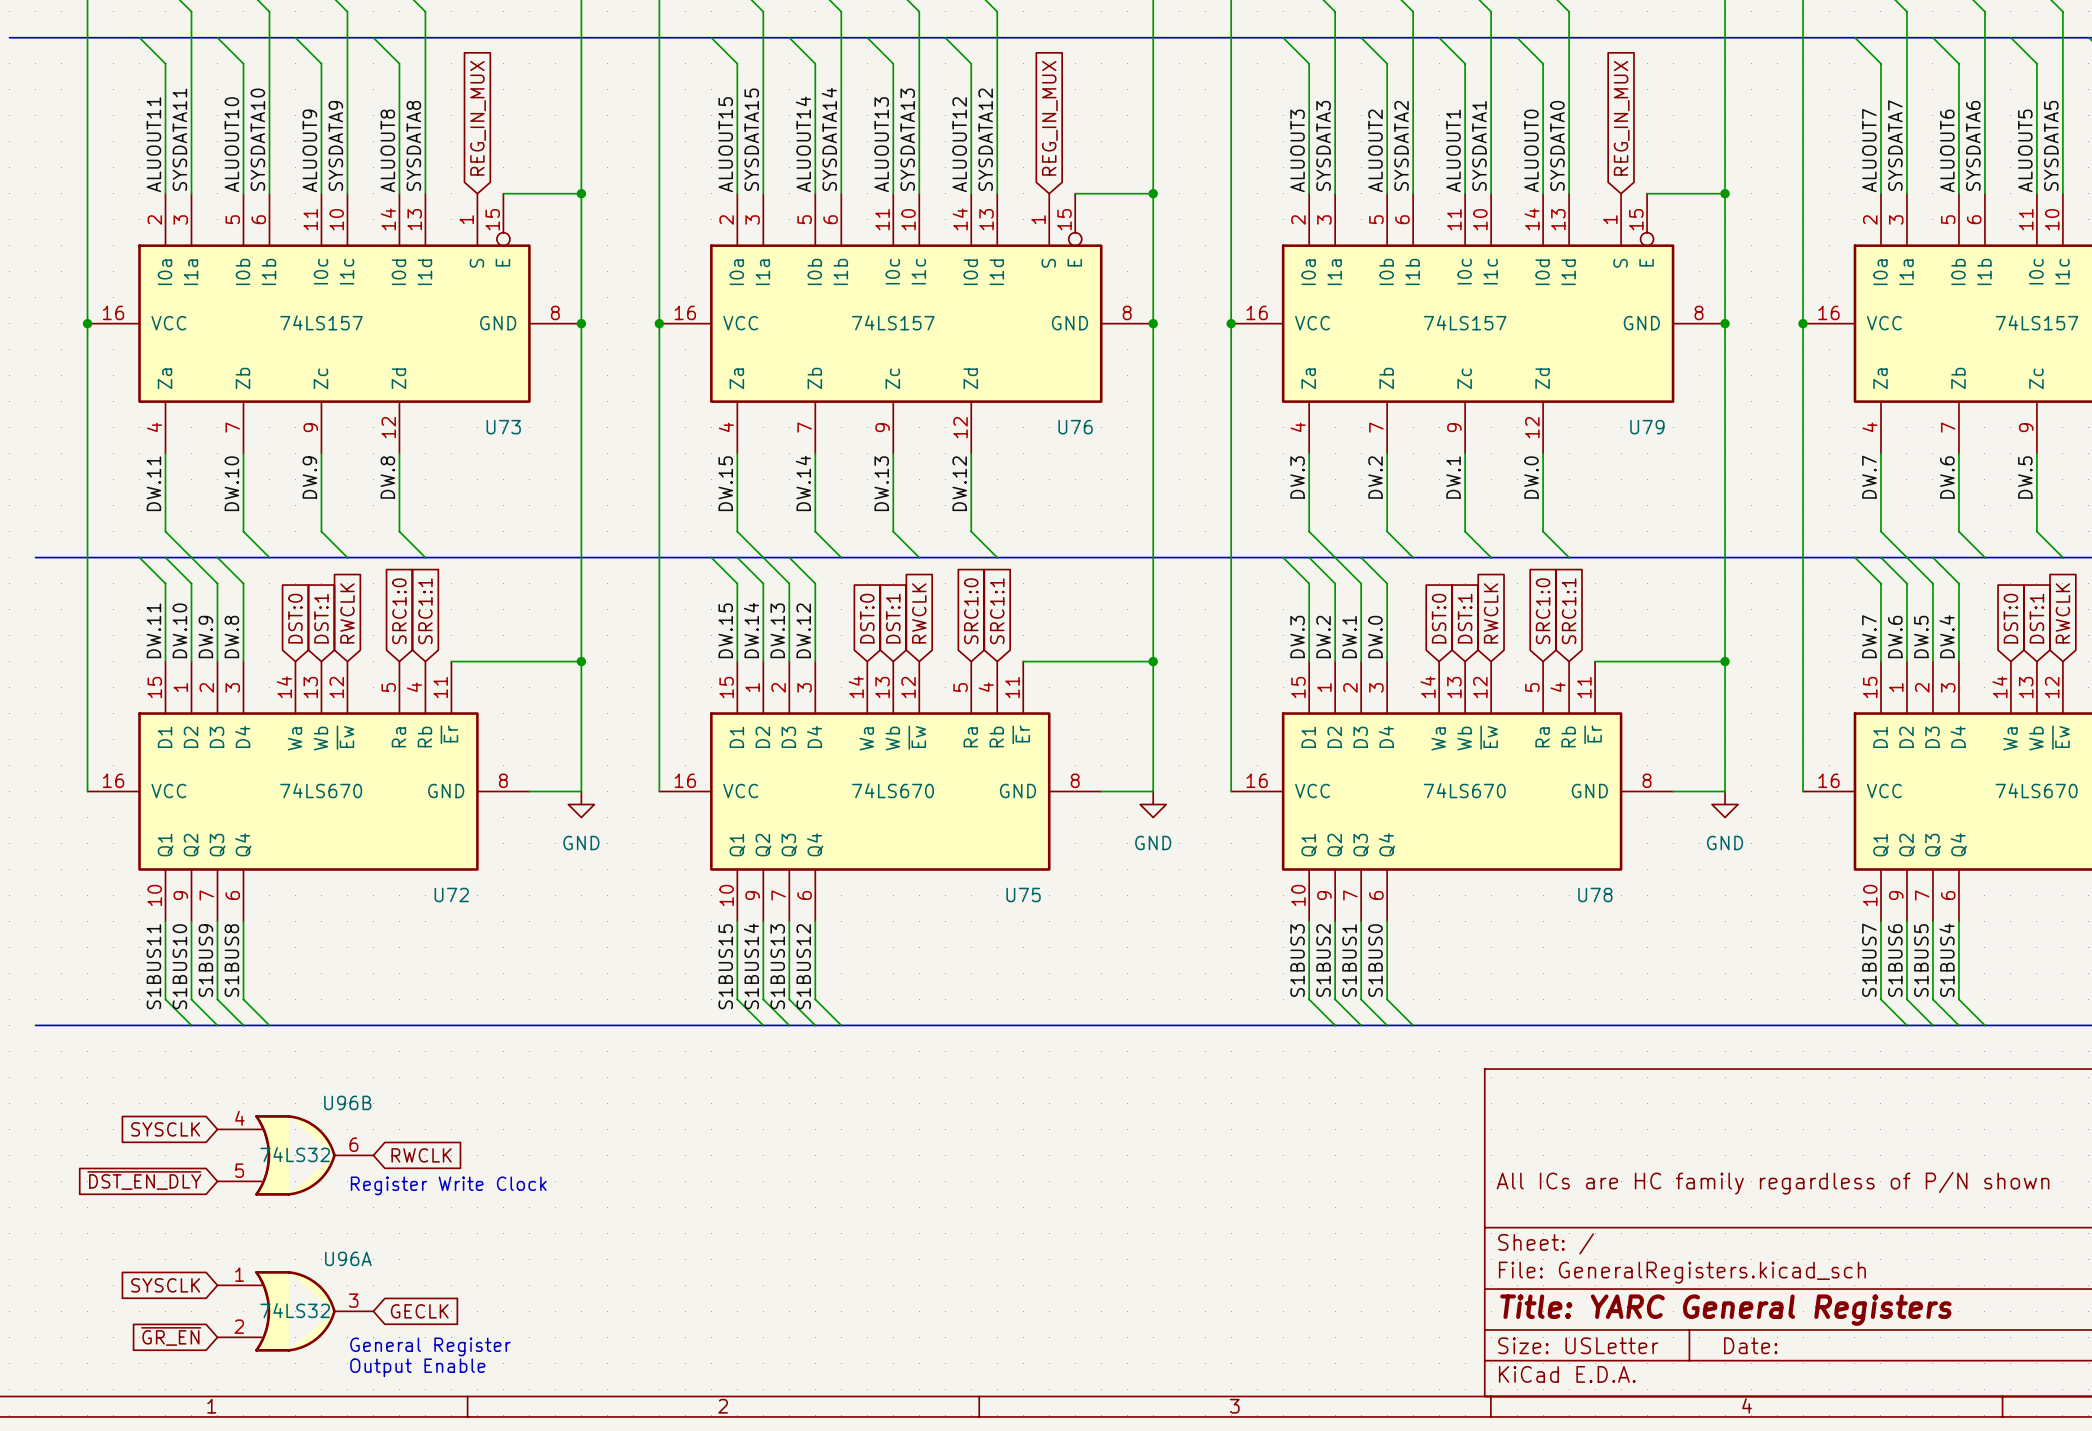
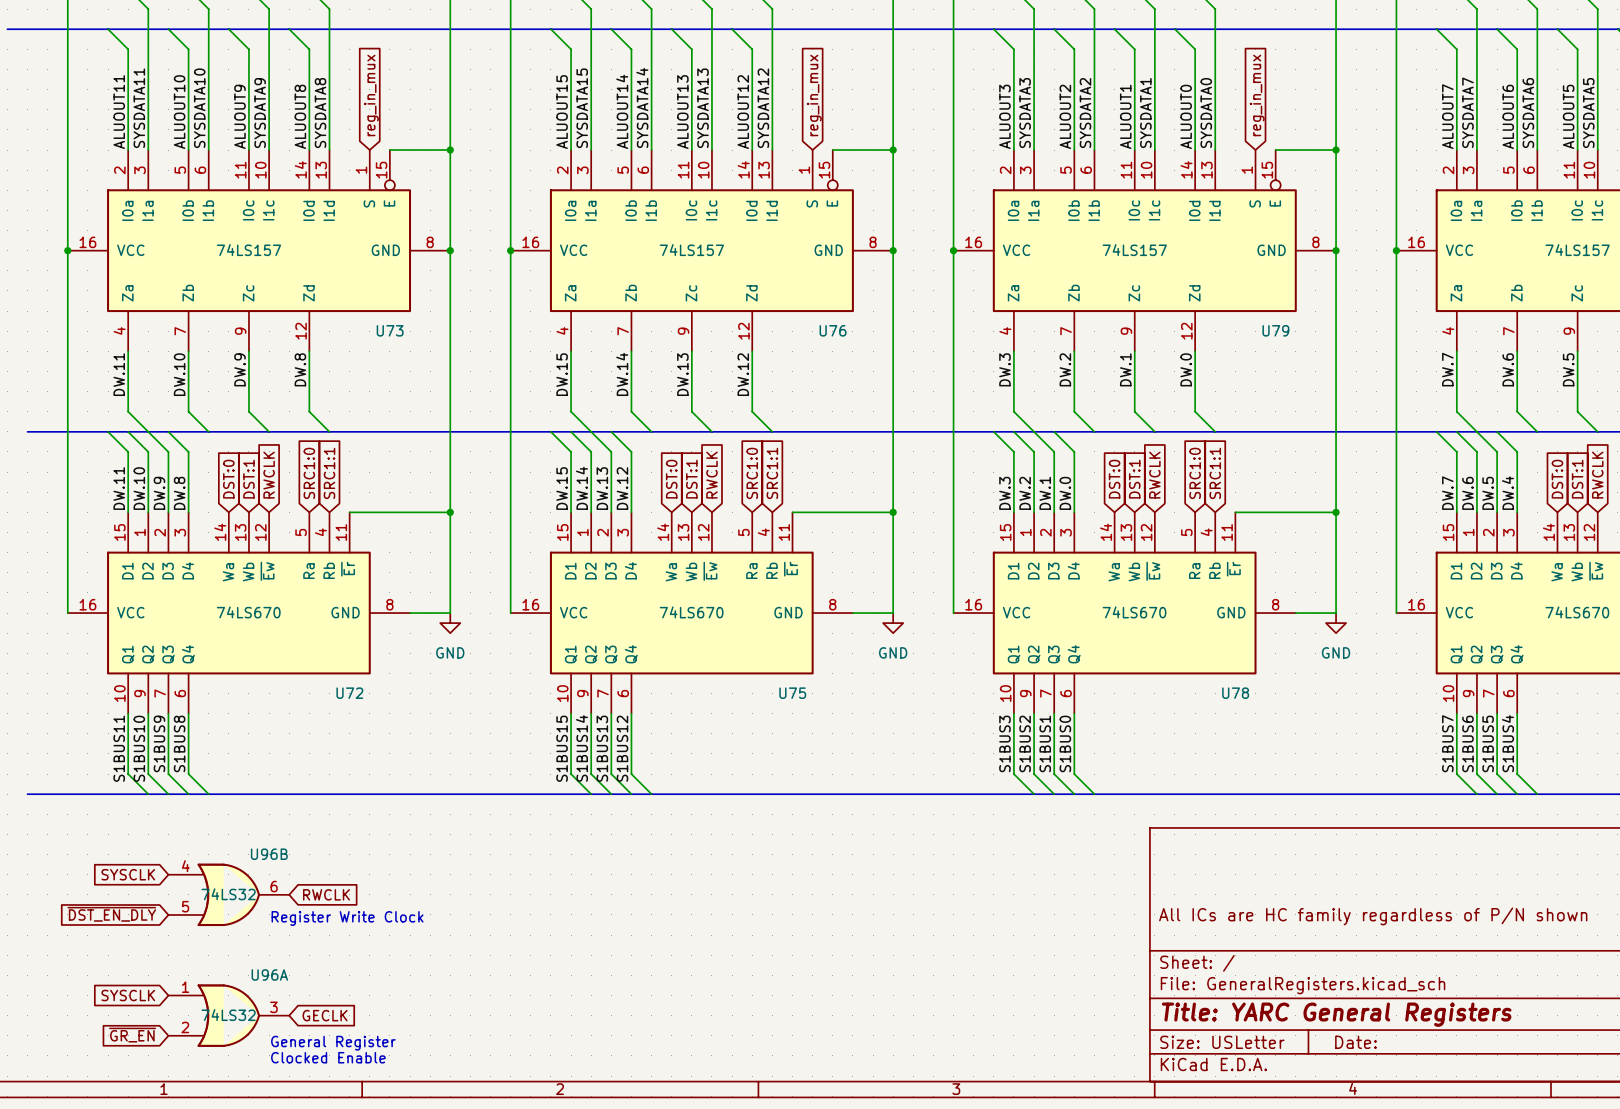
global label: REG_IN_MUX (478, 118) -> reg_in_mux (371, 95)
global label: REG_IN_MUX (1049, 118) -> reg_in_mux (814, 95)
global label: REG_IN_MUX (1621, 118) -> reg_in_mux (1257, 95)
text: Output Enable (417, 1367) -> Clocked Enable (328, 1057)

